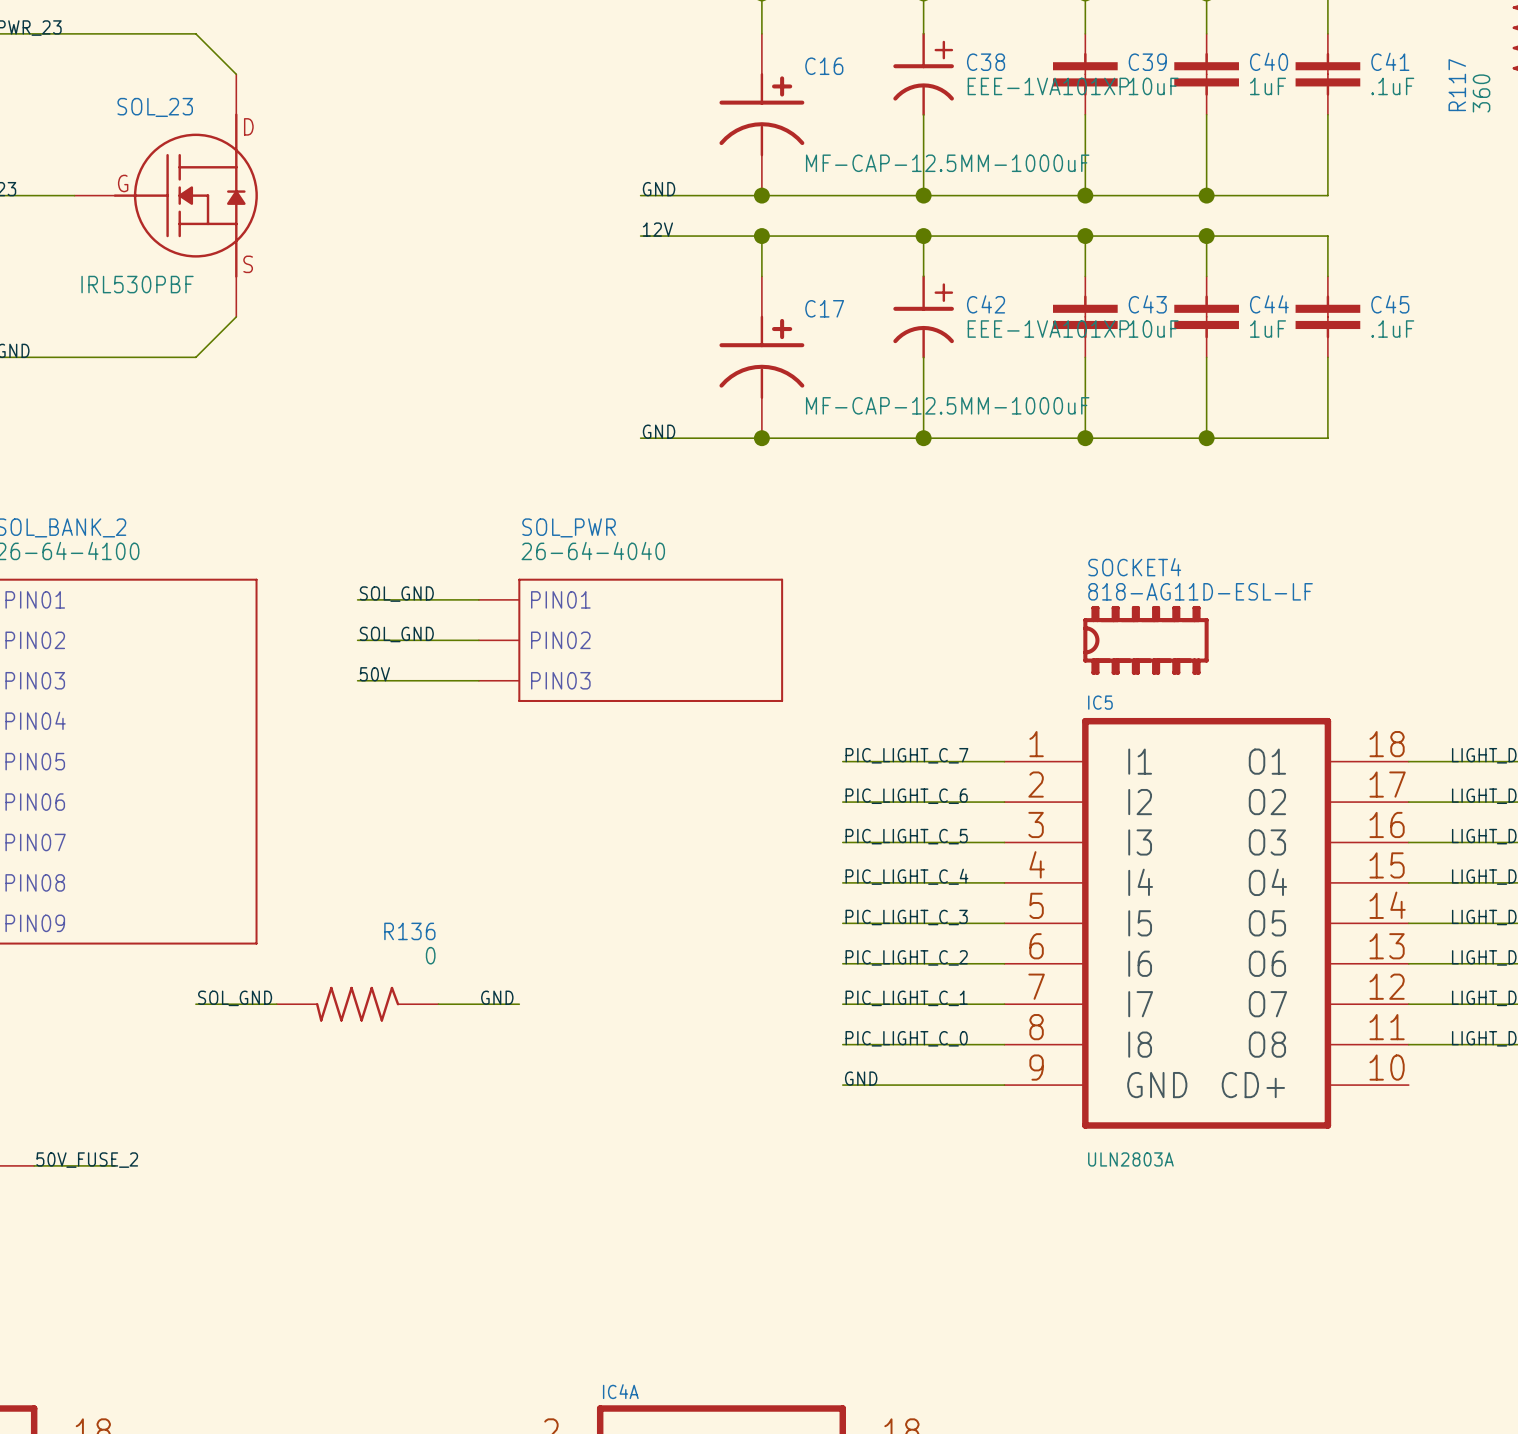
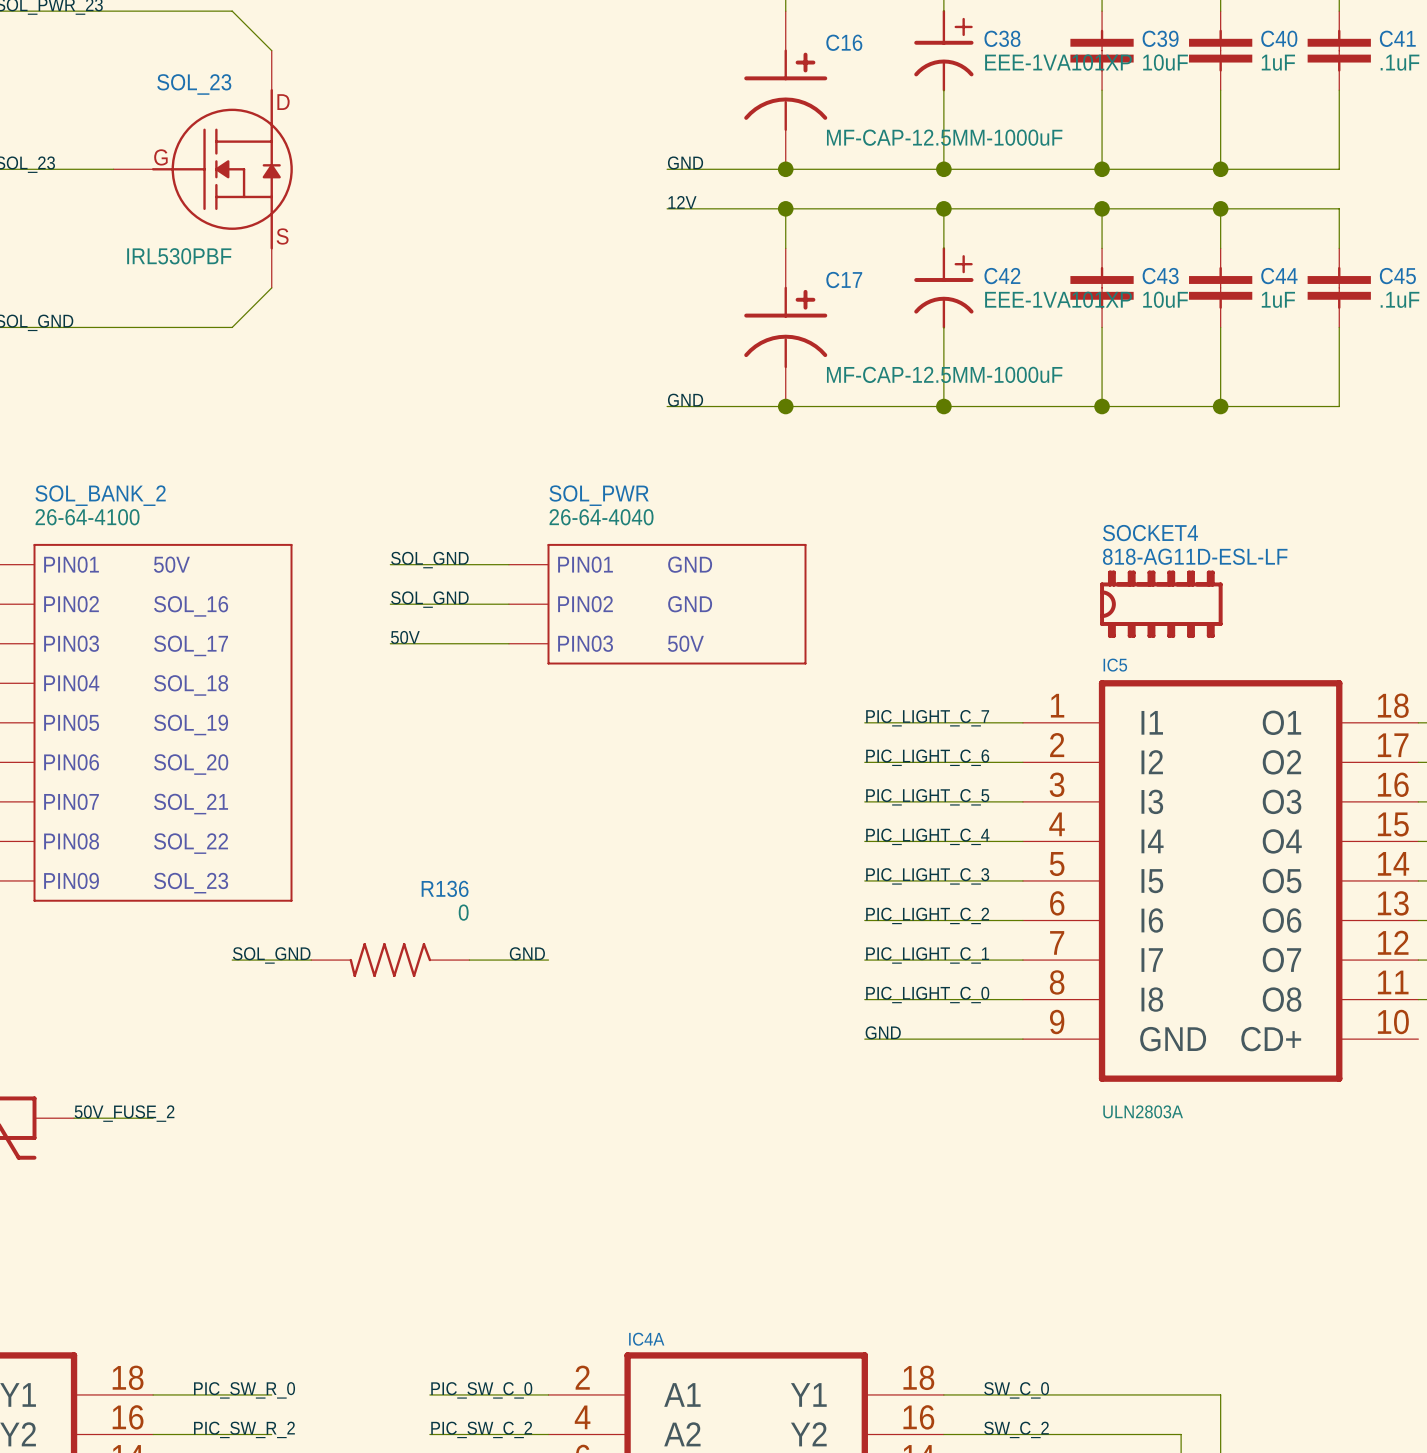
SOL_BANK_2 text: none -> 50V (171, 564)
SOL_PWR text: none -> GND (690, 564)
SOL_PWR text: none -> GND (690, 604)
SOL_BANK_2 text: none -> SOL_16 (191, 606)
SOL_PWR text: none -> 50V (685, 643)
SOL_BANK_2 text: none -> SOL_17 (191, 645)
SOL_BANK_2 text: none -> SOL_18 (191, 685)
SOL_BANK_2 text: none -> SOL_19 (191, 724)
SOL_BANK_2 text: none -> SOL_20 (191, 764)
SOL_BANK_2 text: none -> SOL_21 (191, 804)
SOL_BANK_2 text: none -> SOL_22 (191, 843)
SOL_BANK_2 text: none -> SOL_23 (191, 883)

